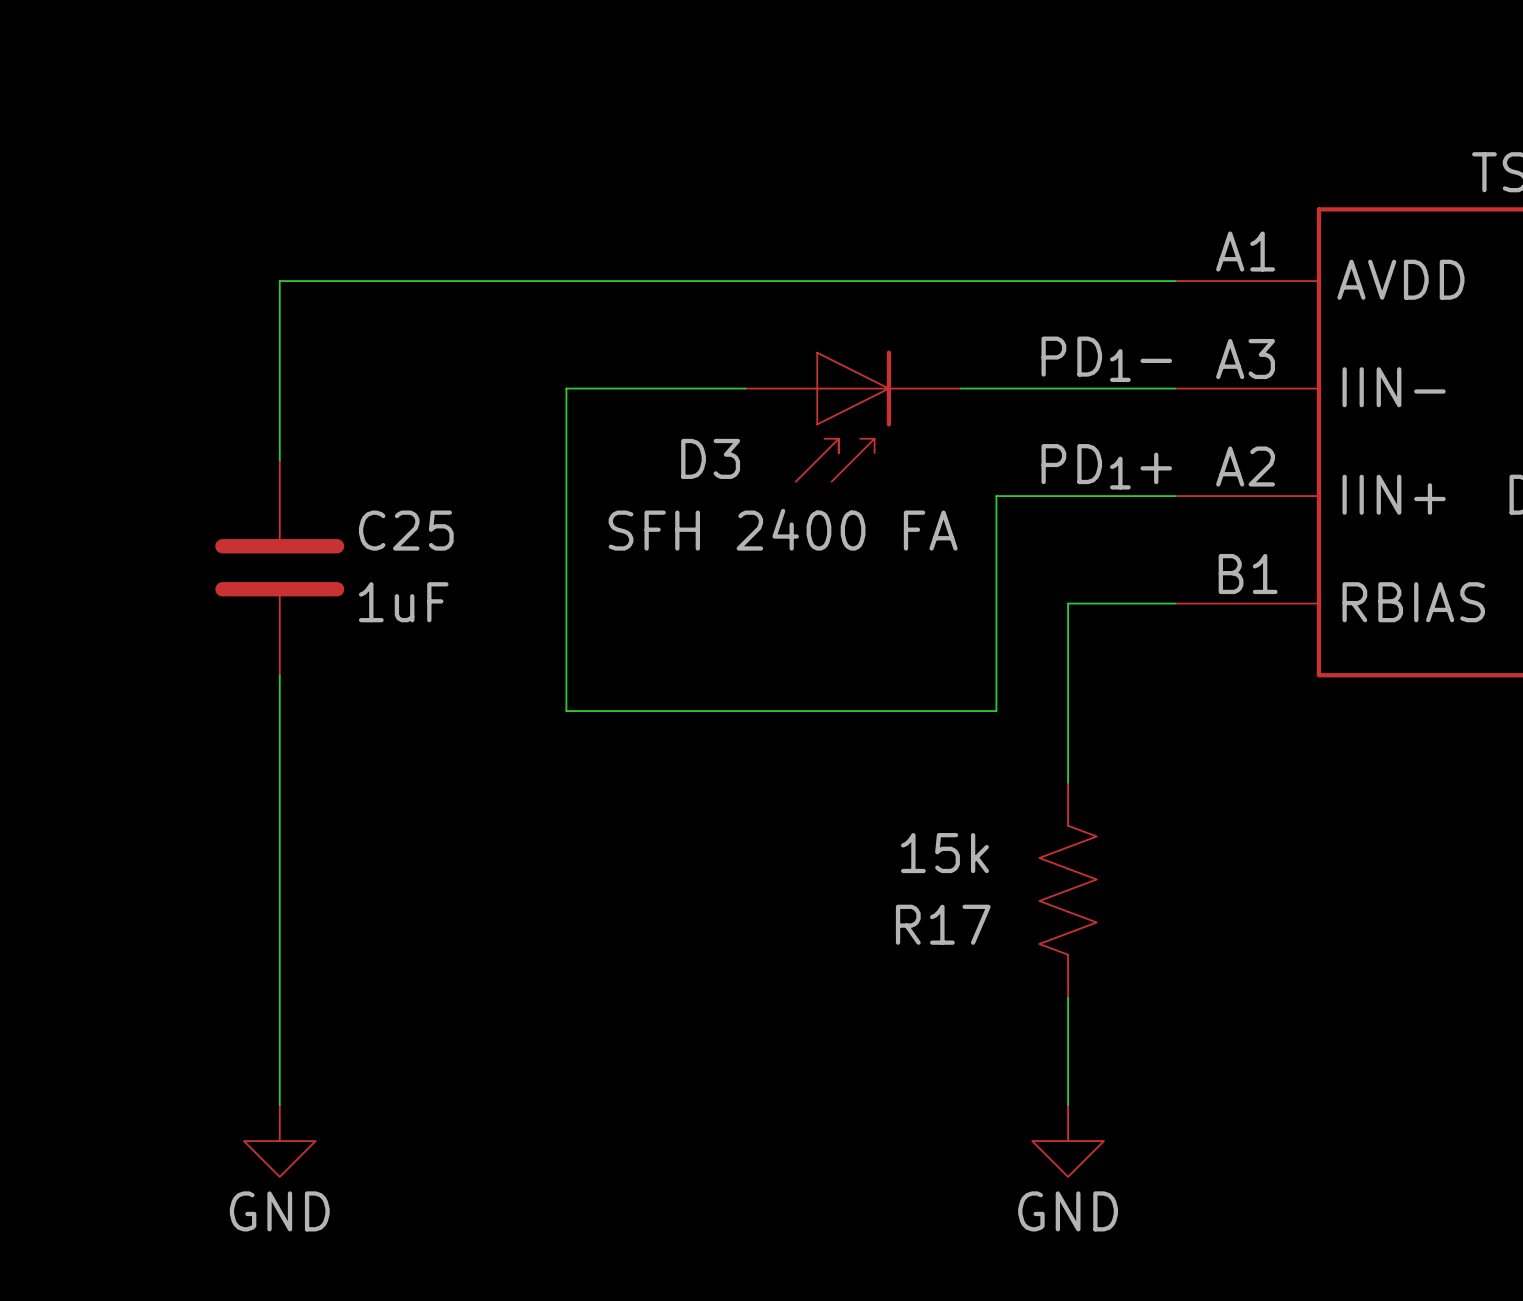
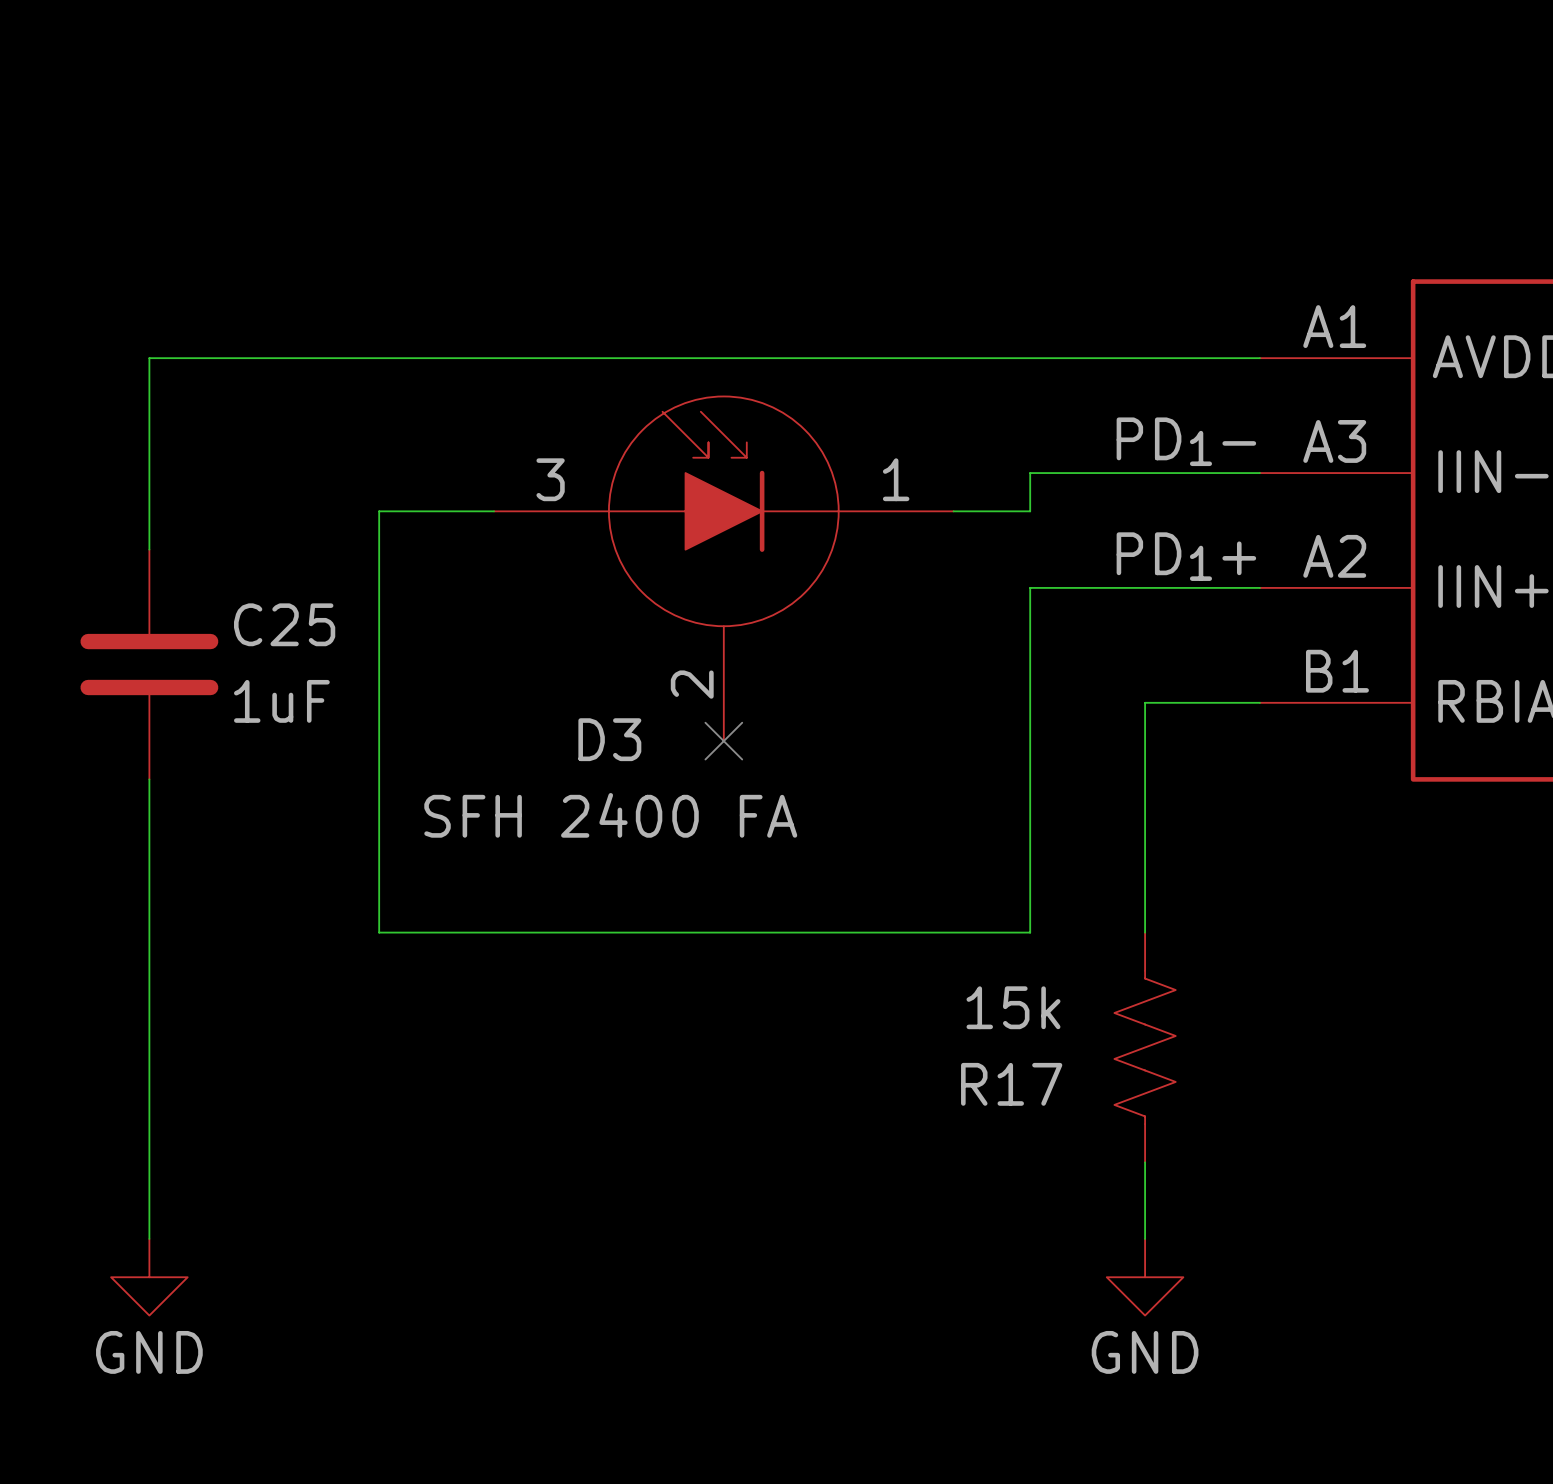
wire: (279, 281) (279, 460) -> (302, 358) (149, 358) (149, 549)
D3 symbol: [745, 350, 961, 482] -> [494, 396, 954, 742]
wire: (745, 388) (566, 388) (566, 711) (996, 711) (996, 496) -> (494, 511) (379, 511) (379, 932) (1030, 932) (1030, 587) (1068, 587)
wire: none -> (1030, 473) (1030, 511) (953, 511)
D3 name position: D3 (710, 458) -> D3 (609, 739)
D3 value position: SFH 2400 FA (783, 529) -> SFH 2400 FA (610, 815)
C25 position: (279, 567) -> (149, 664)
no-connect mark: none -> (723, 741)
wire: (279, 675) (279, 1105) -> (149, 779) (149, 1238)
R17 position: (1068, 890) -> (1145, 1047)
power symbol position: GND (279, 1141) -> GND (149, 1277)

